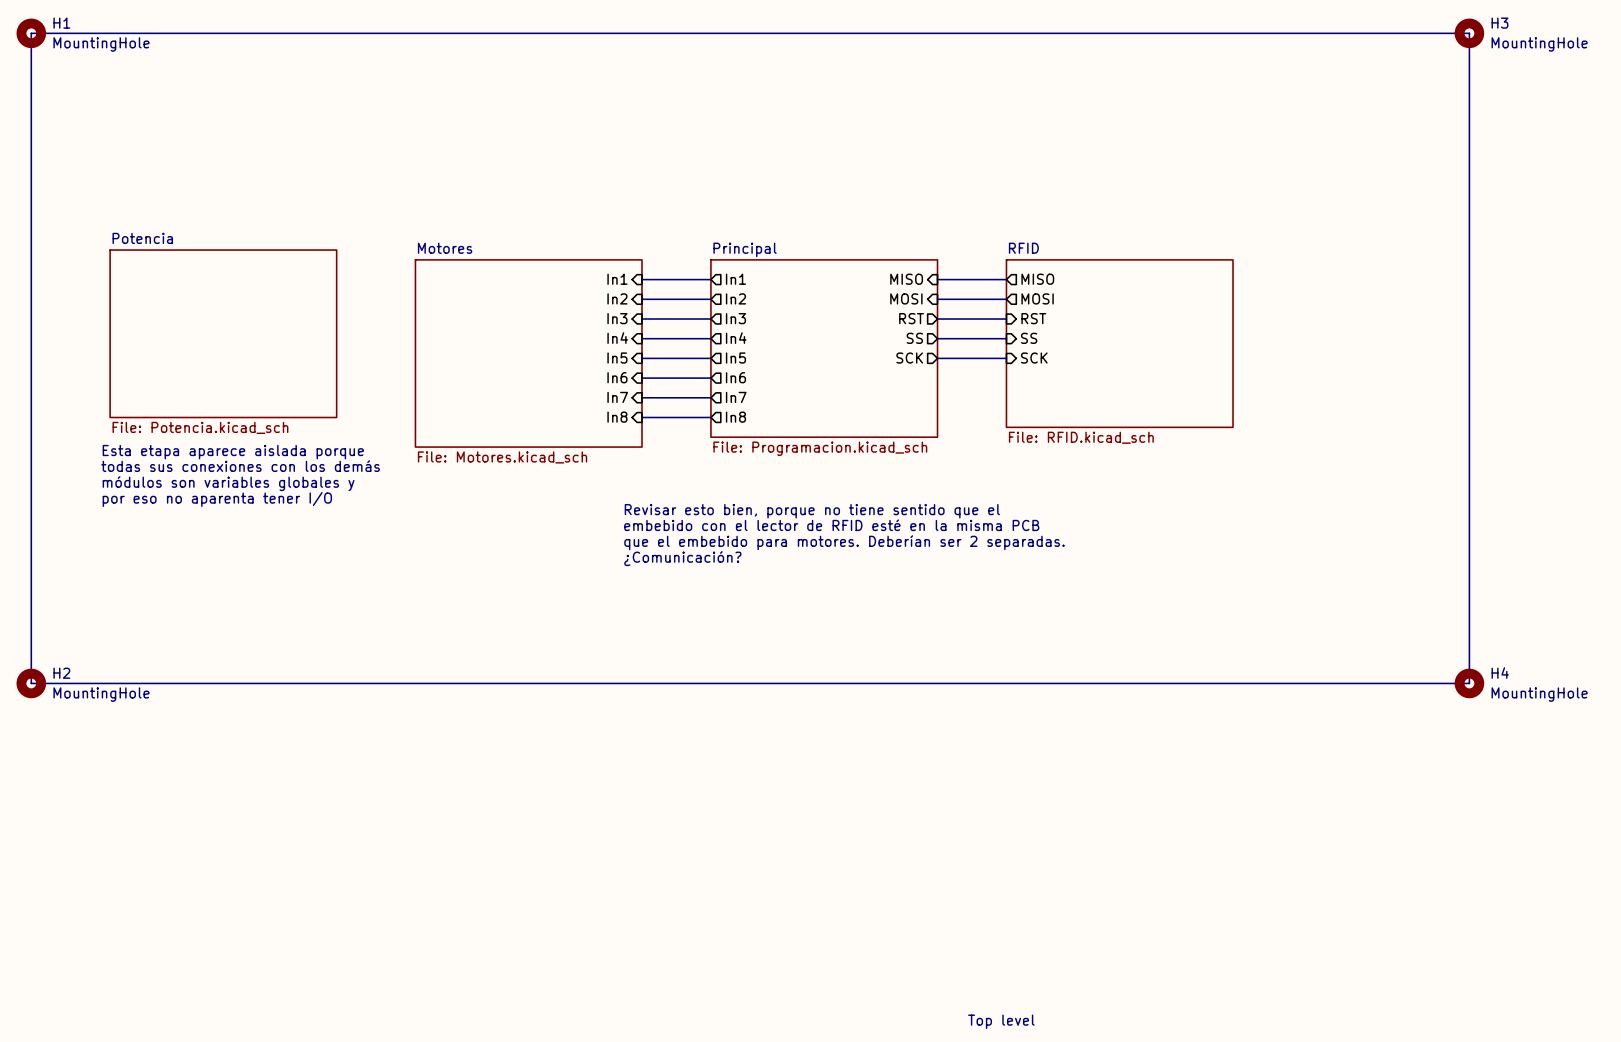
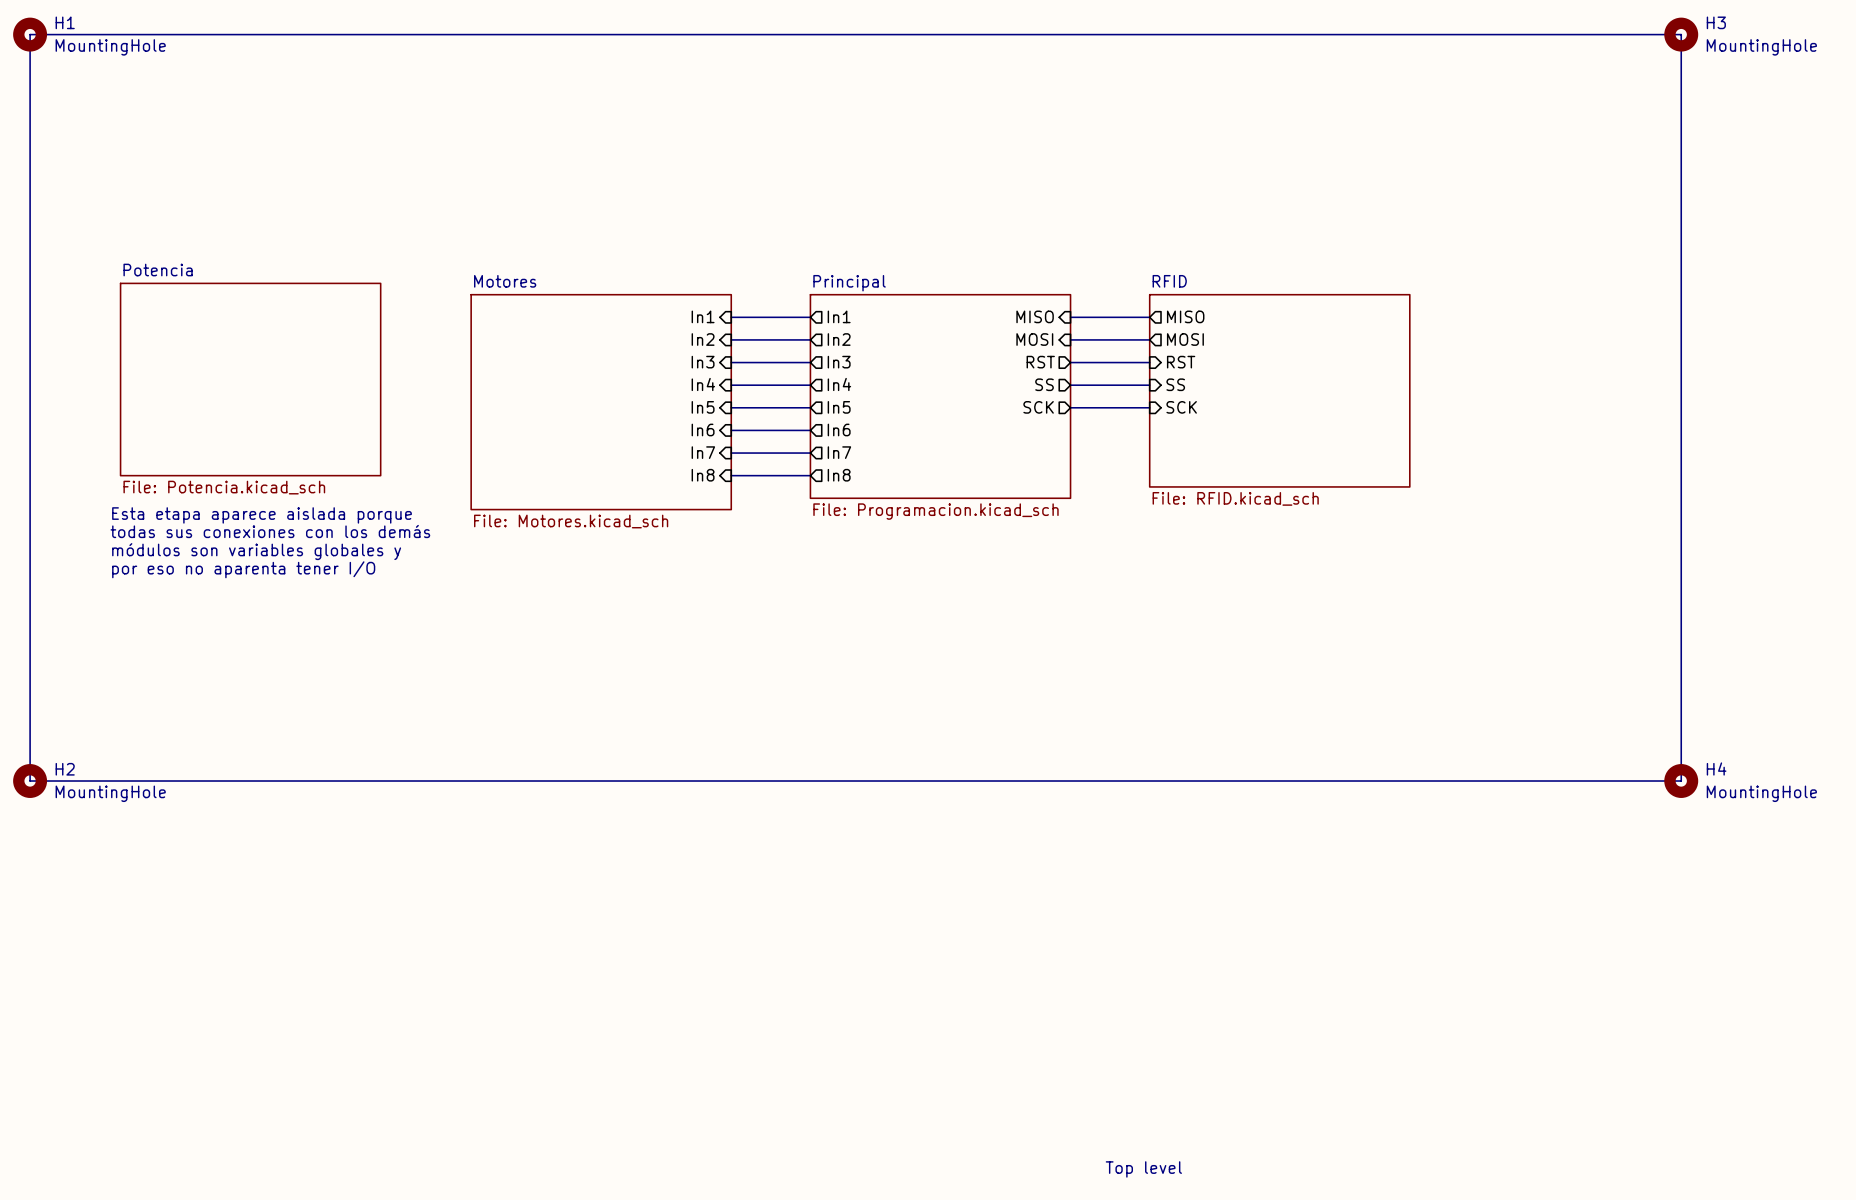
text: Revisar esto bien, porque no tiene sentido que el (812, 511) -> none
text: embebido con el lector de RFID esté en la misma PCB (831, 525) -> none
text: que el embebido para motores. Deberían ser 2 separadas. (844, 542) -> none
text: ¿Comunicación? (682, 558) -> none

